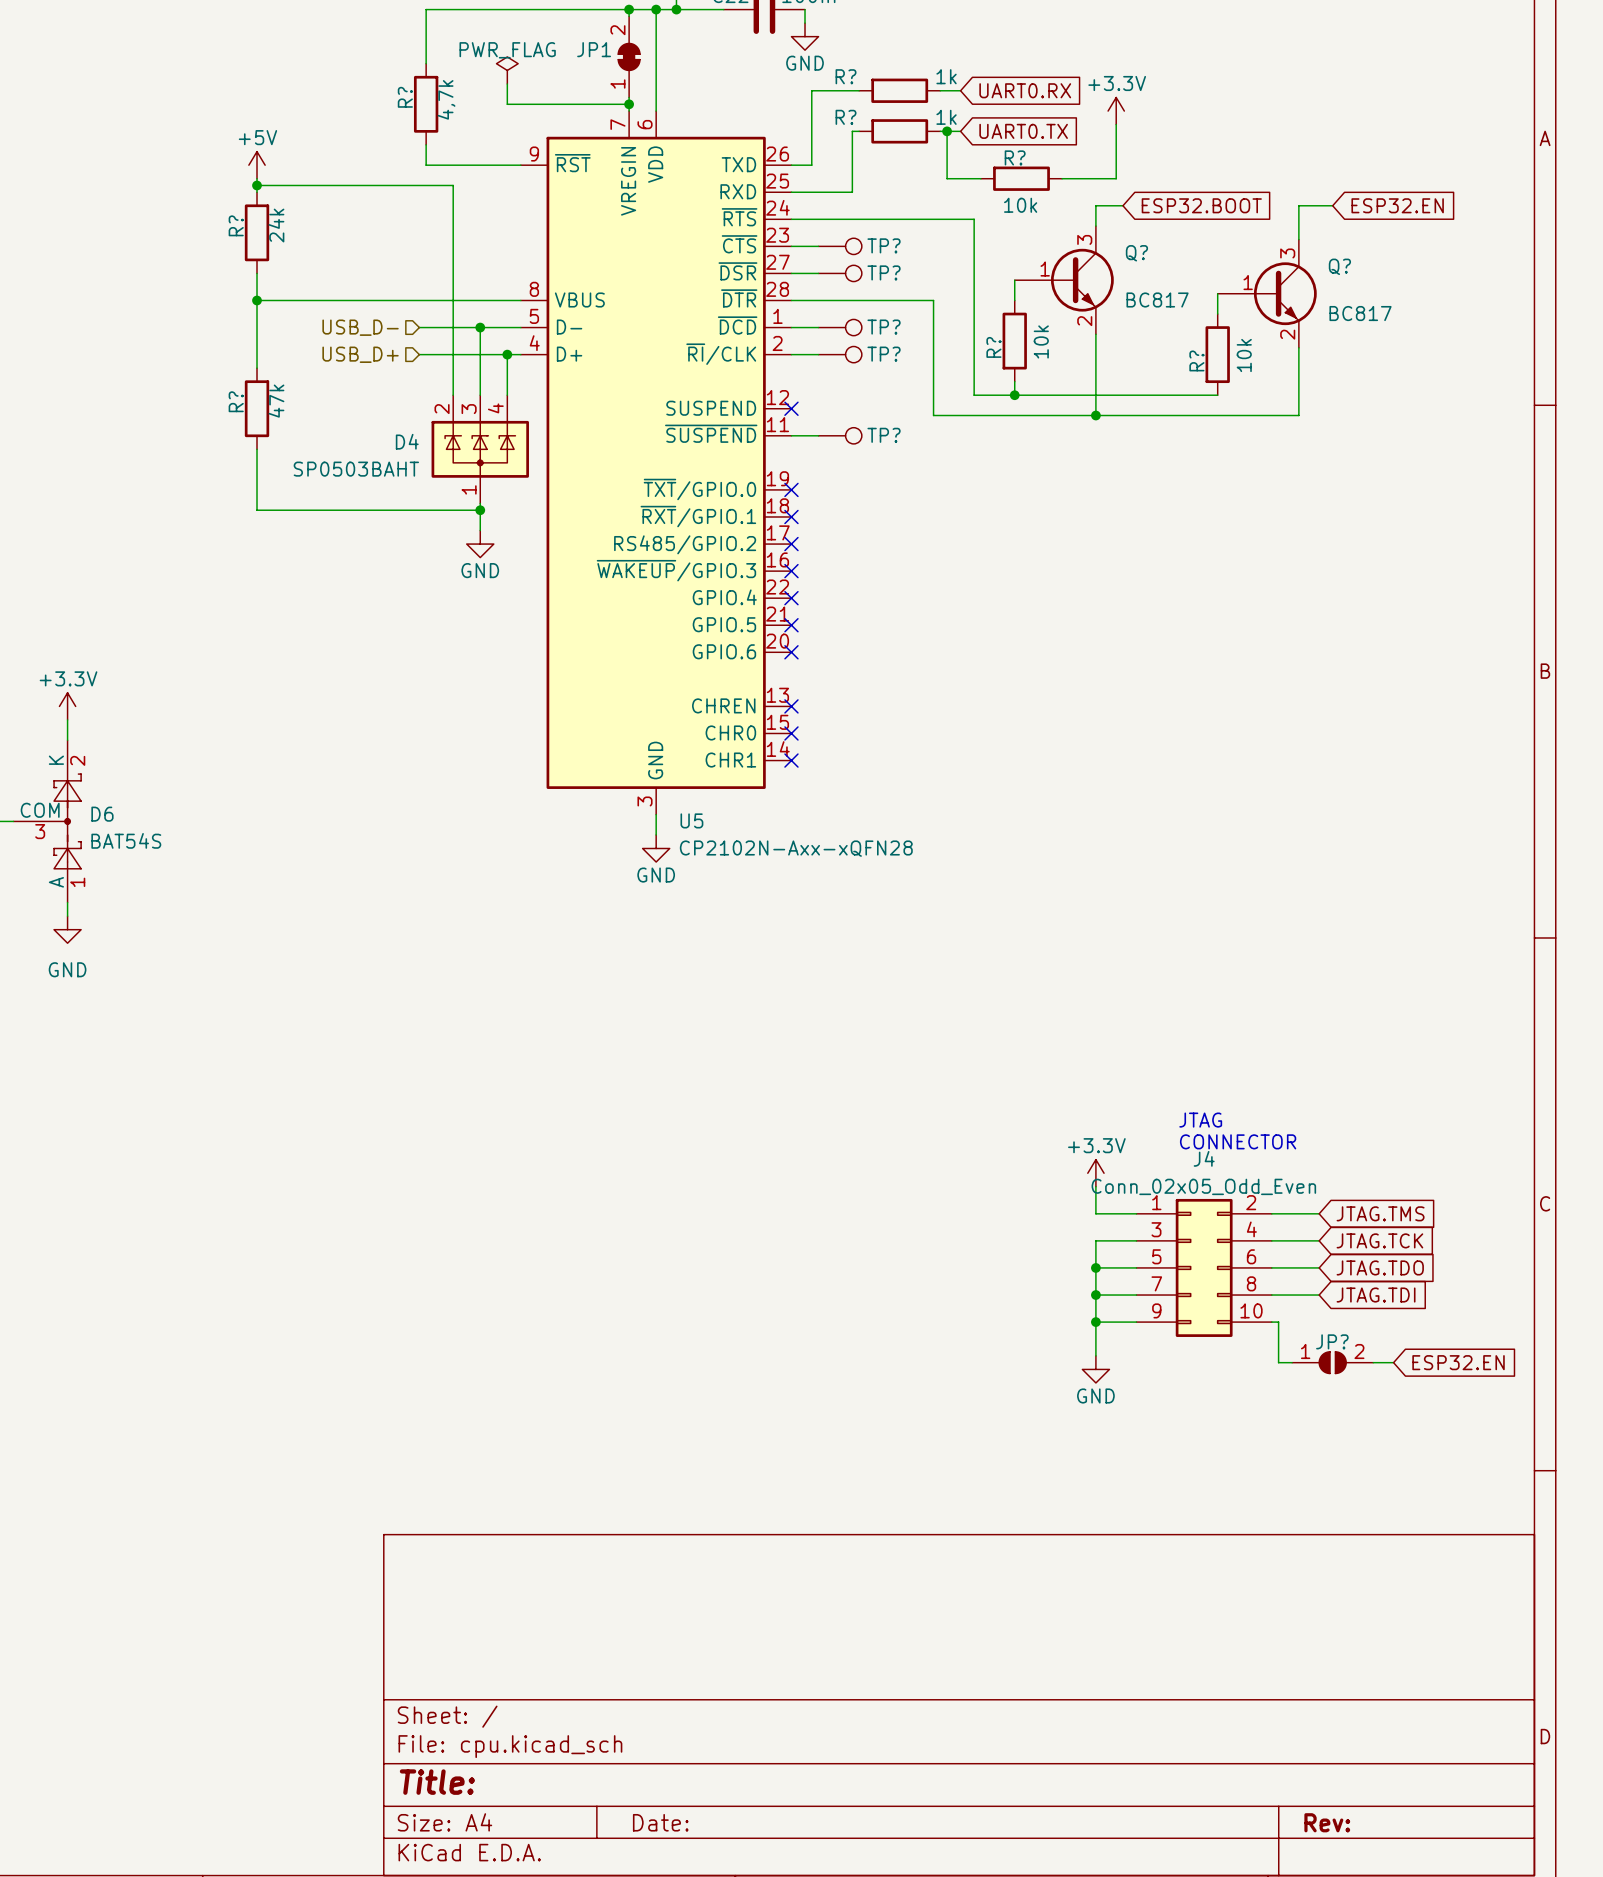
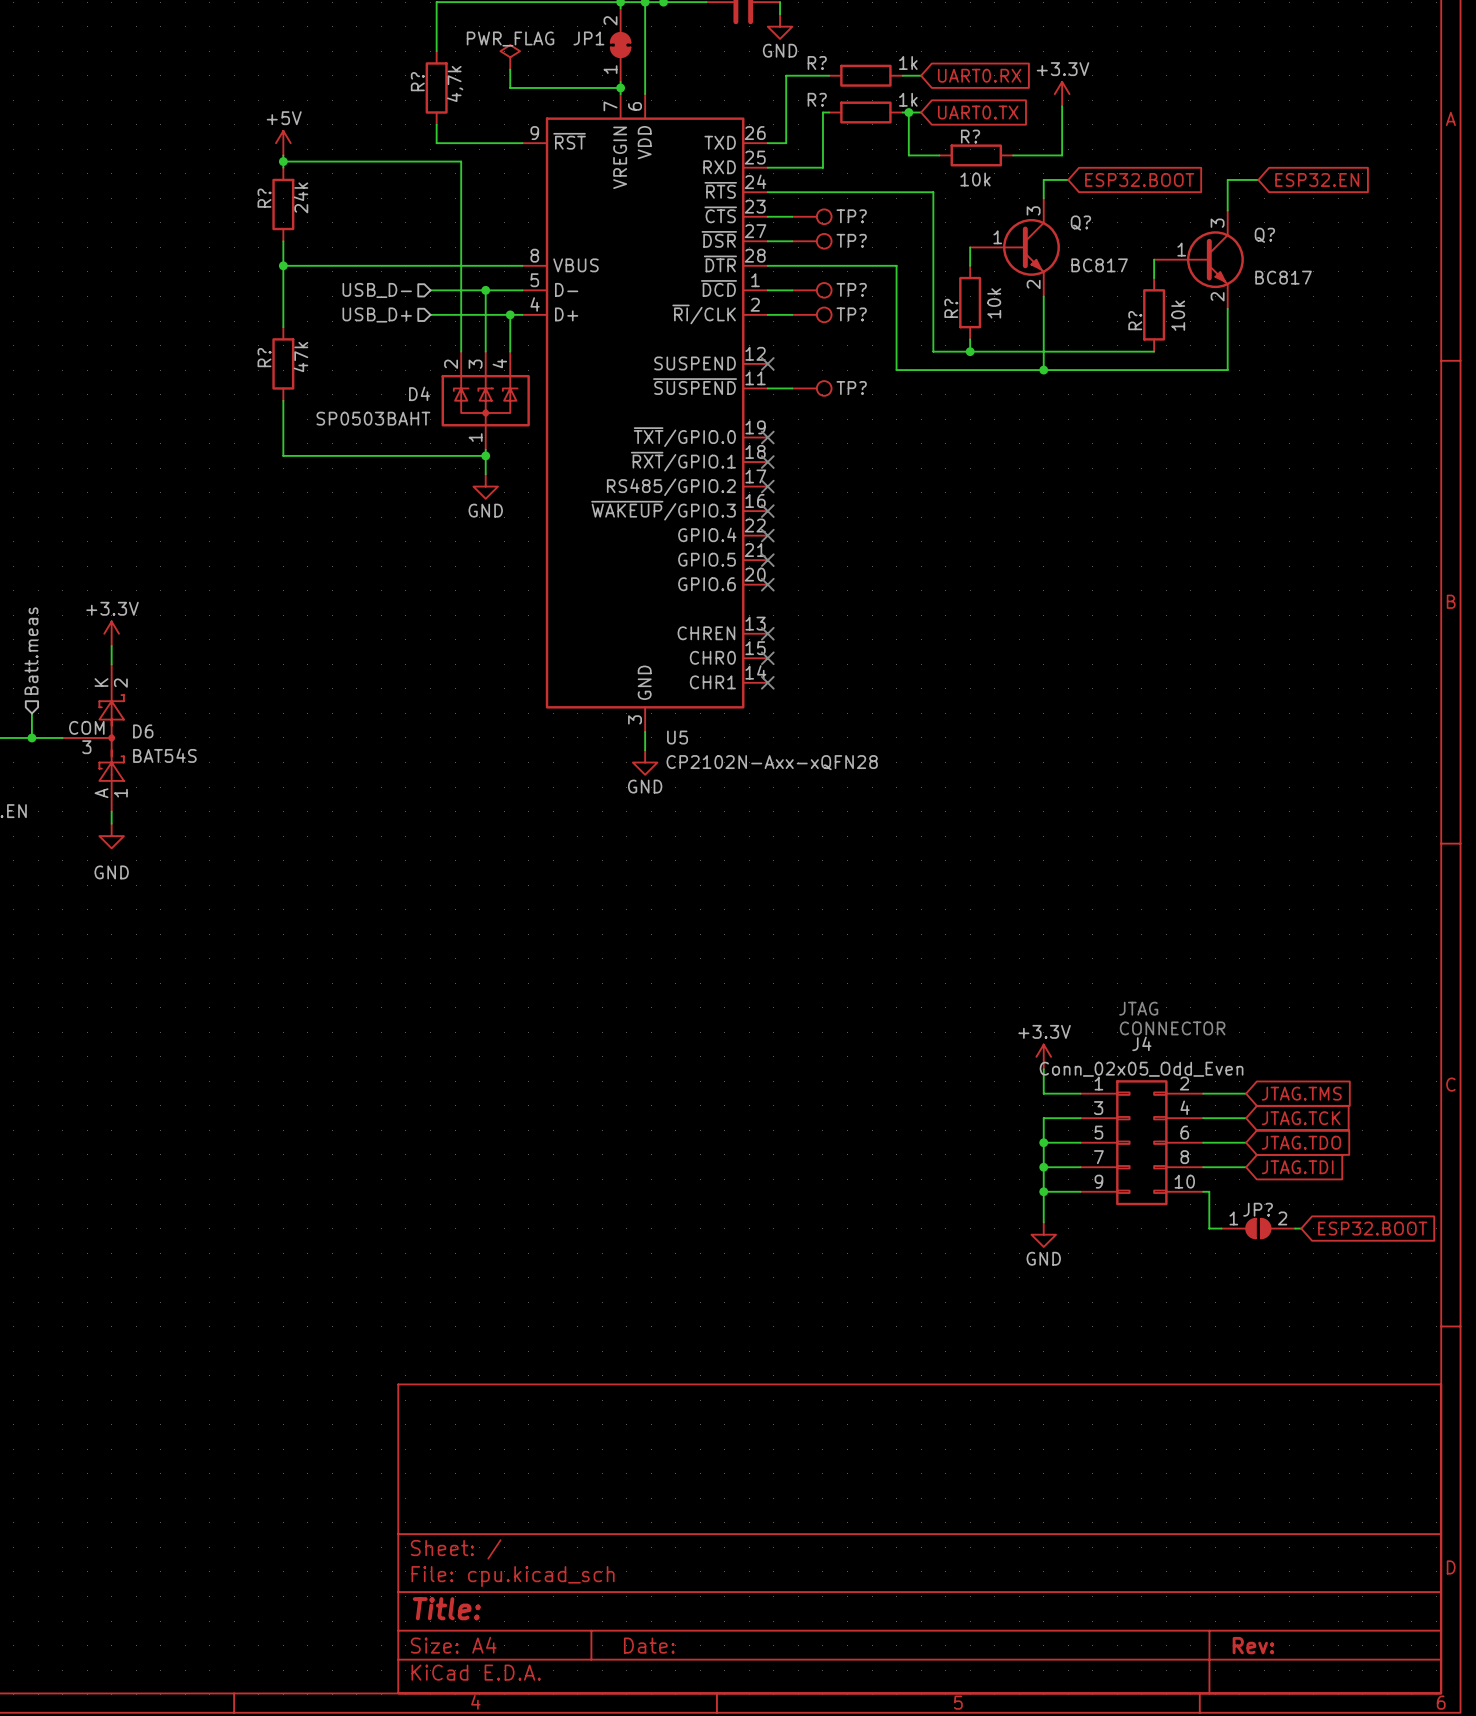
wire: (1380, 1362) (1393, 1362) -> none
global label: ESP32.EN (1458, 1362) -> ESP32.BOOT (1372, 1228)

